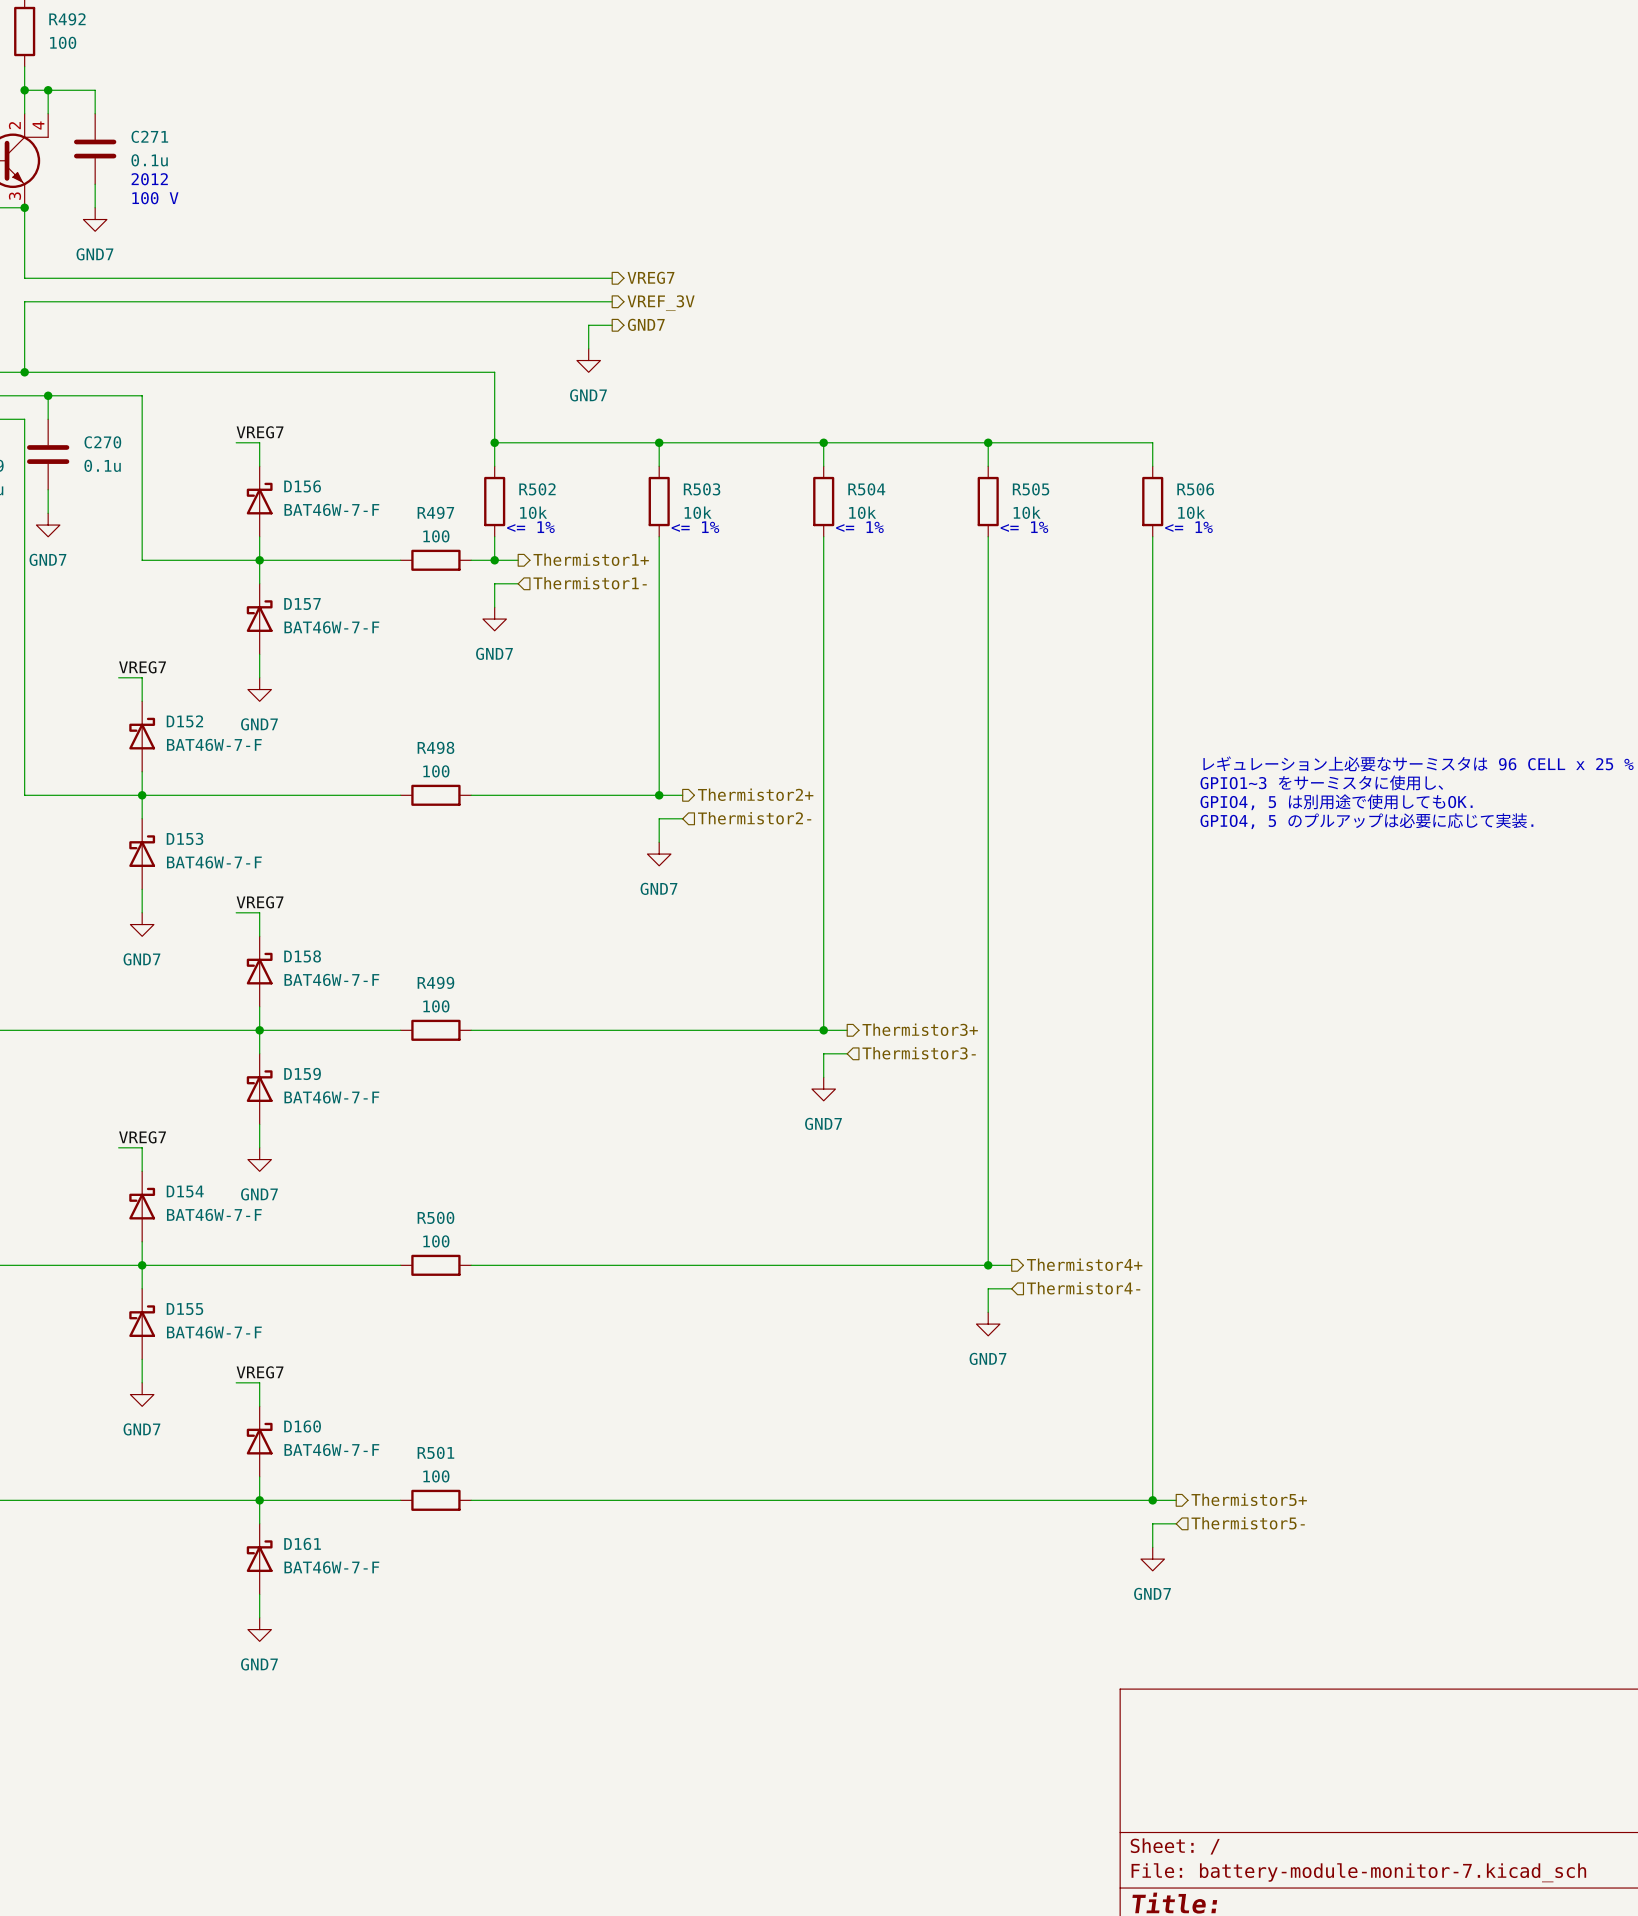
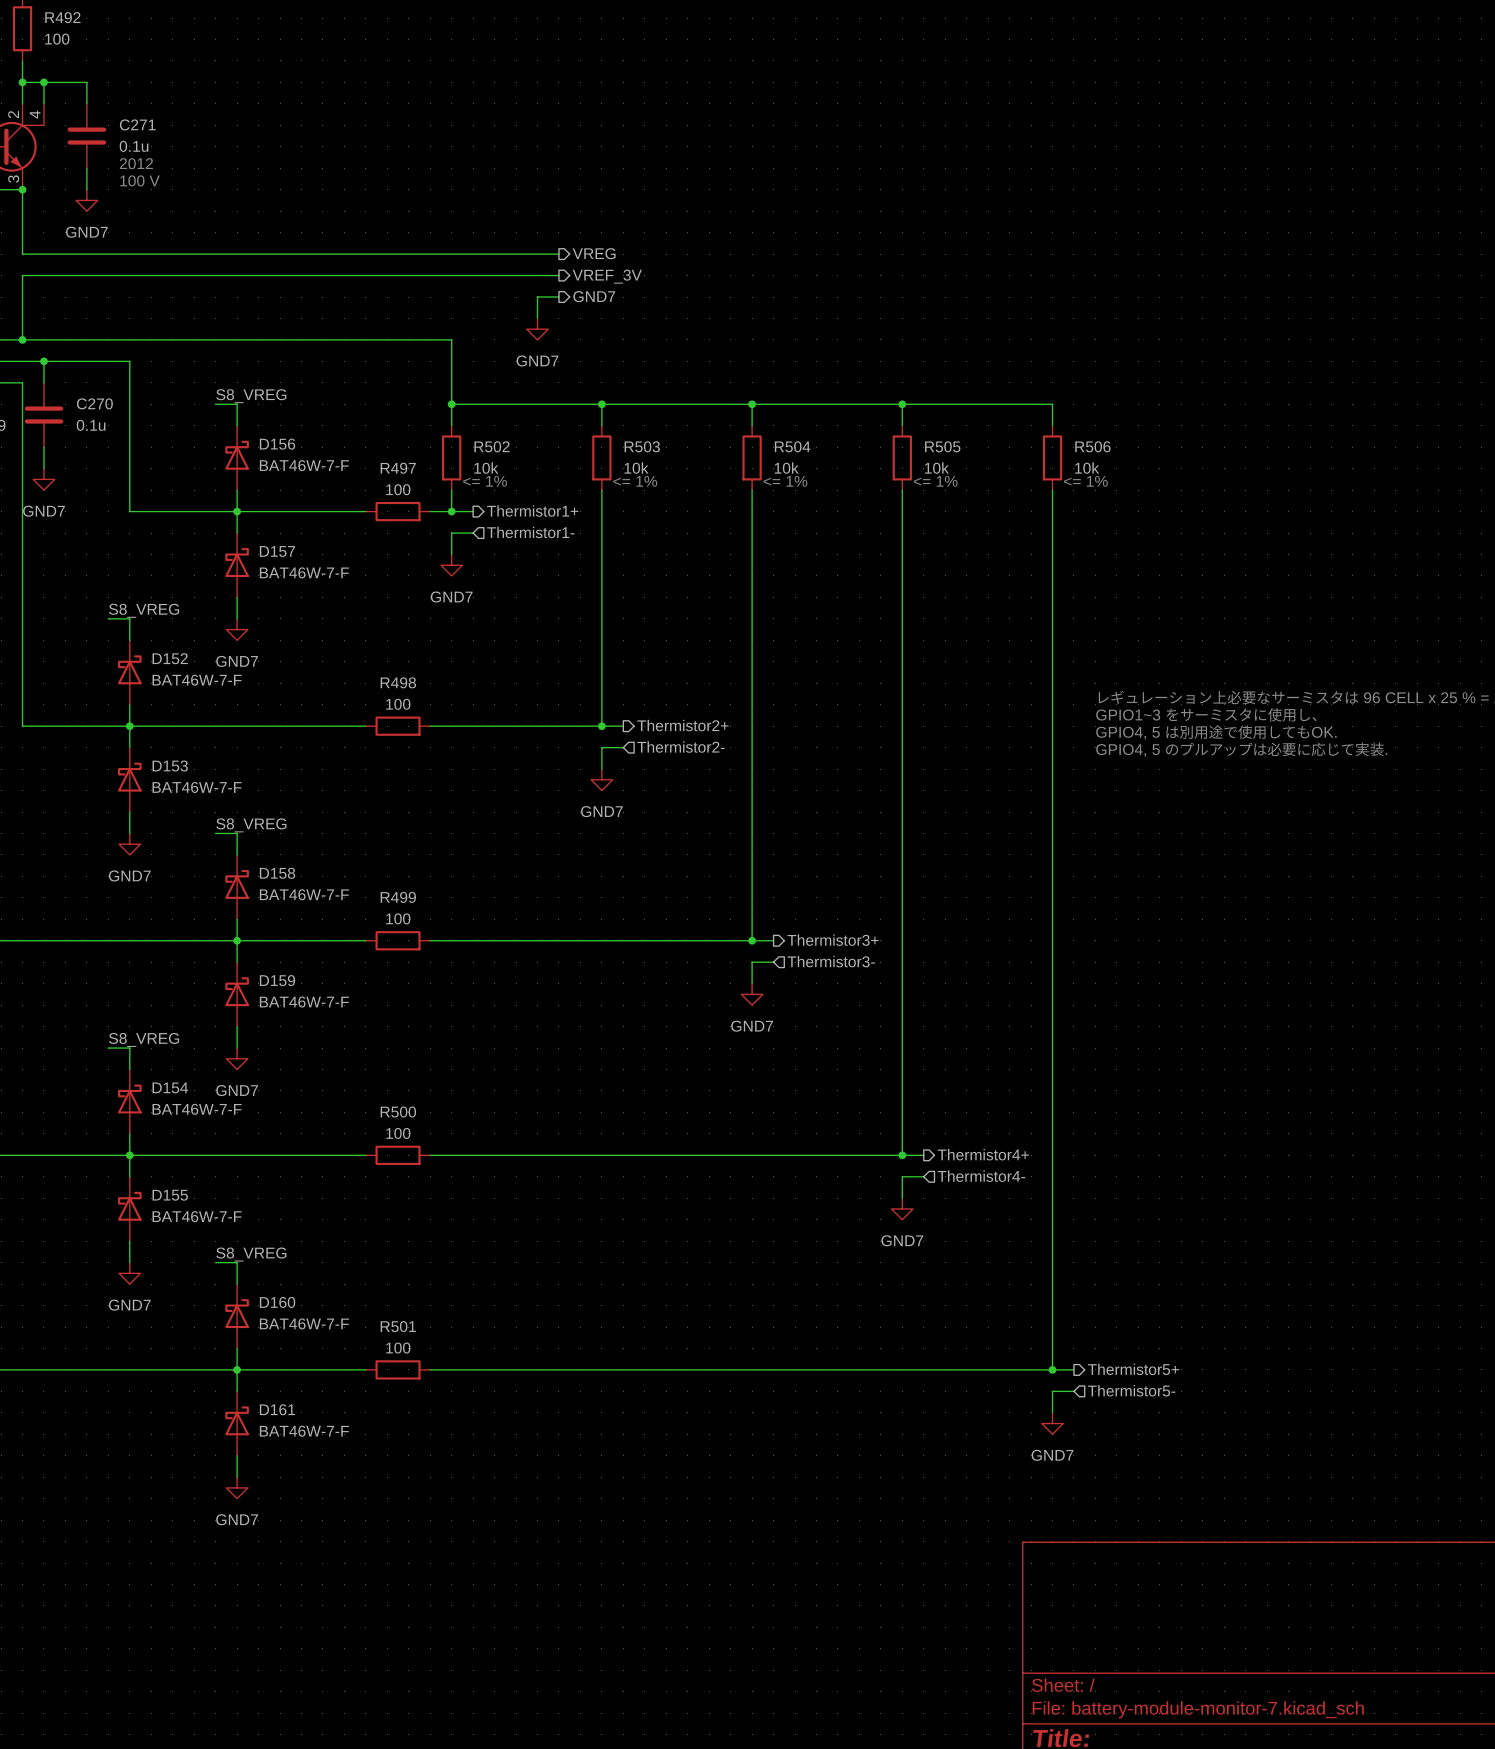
hierarchical label: VREG7 (650, 277) -> VREG (594, 253)
label: VREG7 (260, 432) -> S8_VREG (251, 396)
label: VREG7 (142, 667) -> S8_VREG (144, 610)
label: VREG7 (260, 902) -> S8_VREG (251, 825)
label: VREG7 (142, 1137) -> S8_VREG (144, 1039)
label: VREG7 (260, 1372) -> S8_VREG (251, 1254)

